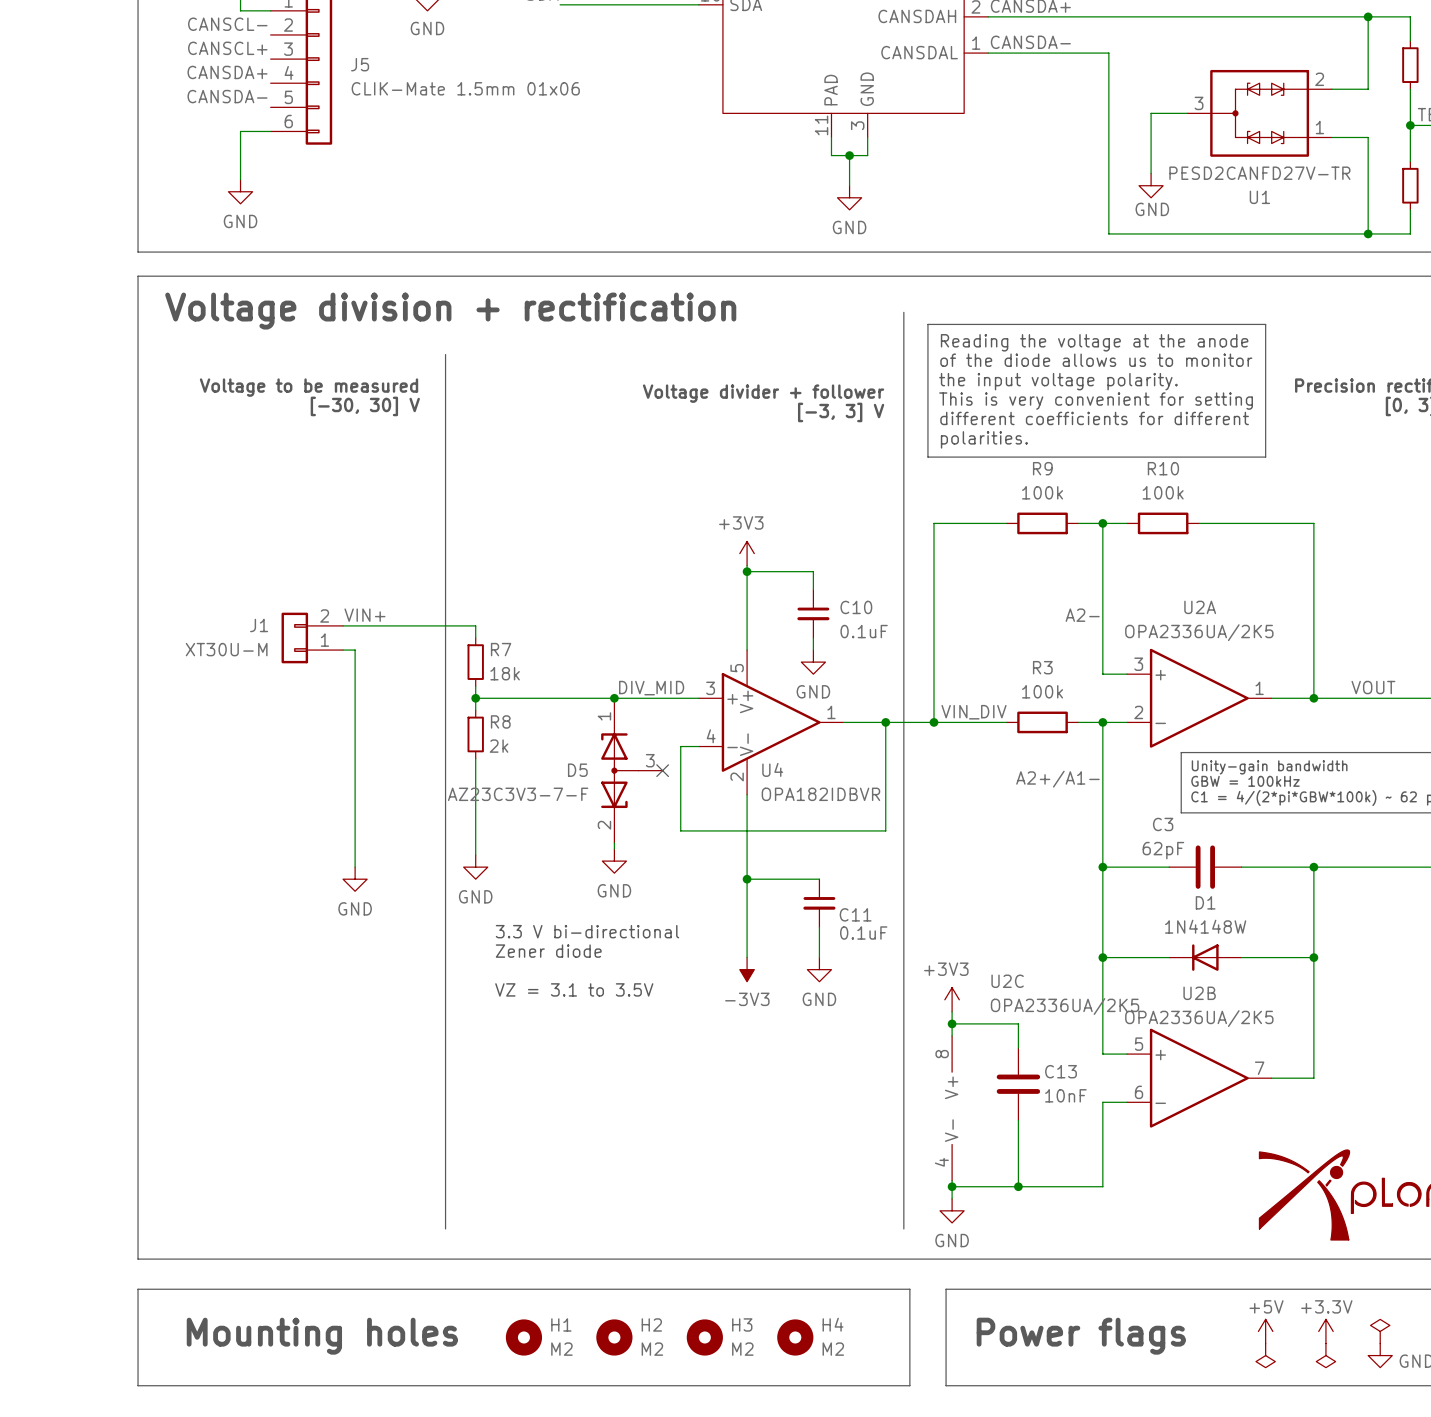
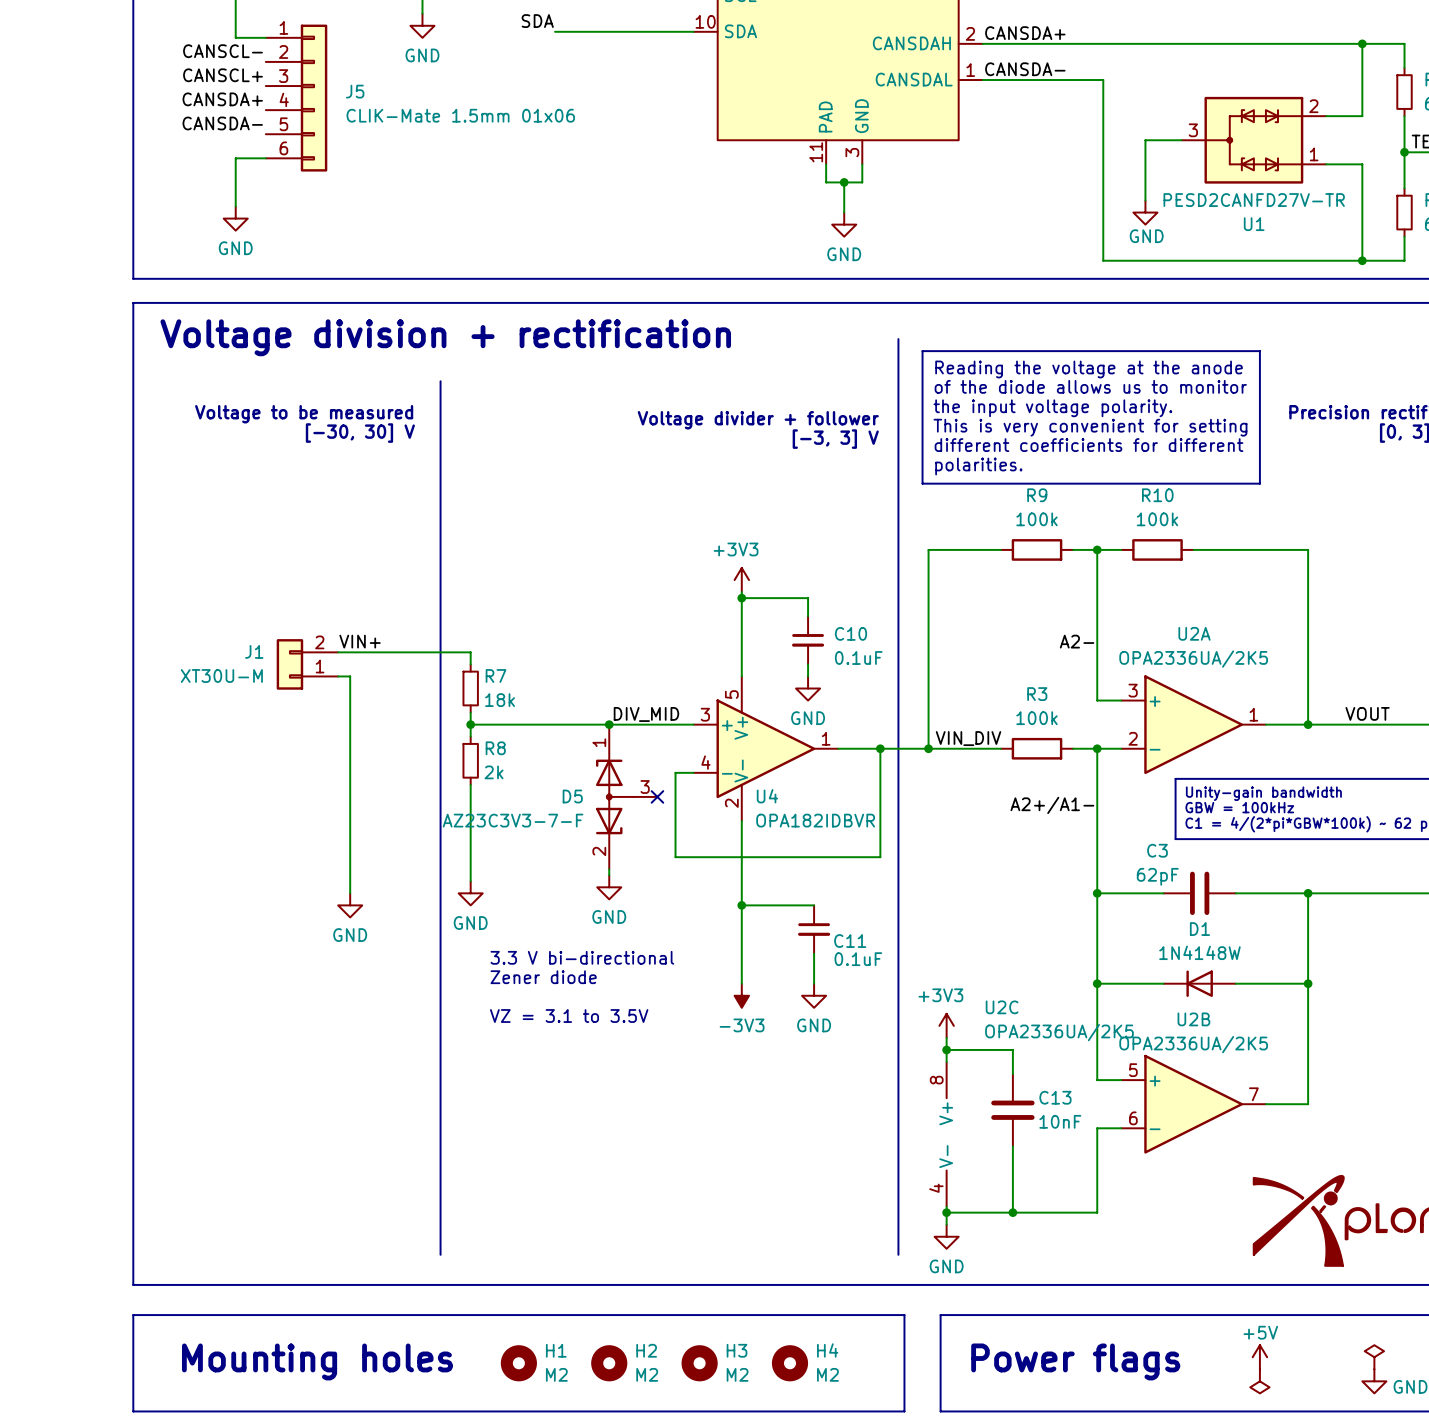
power symbol: +3.3V (1325, 1331) -> none
power symbol: (1325, 1355) -> none

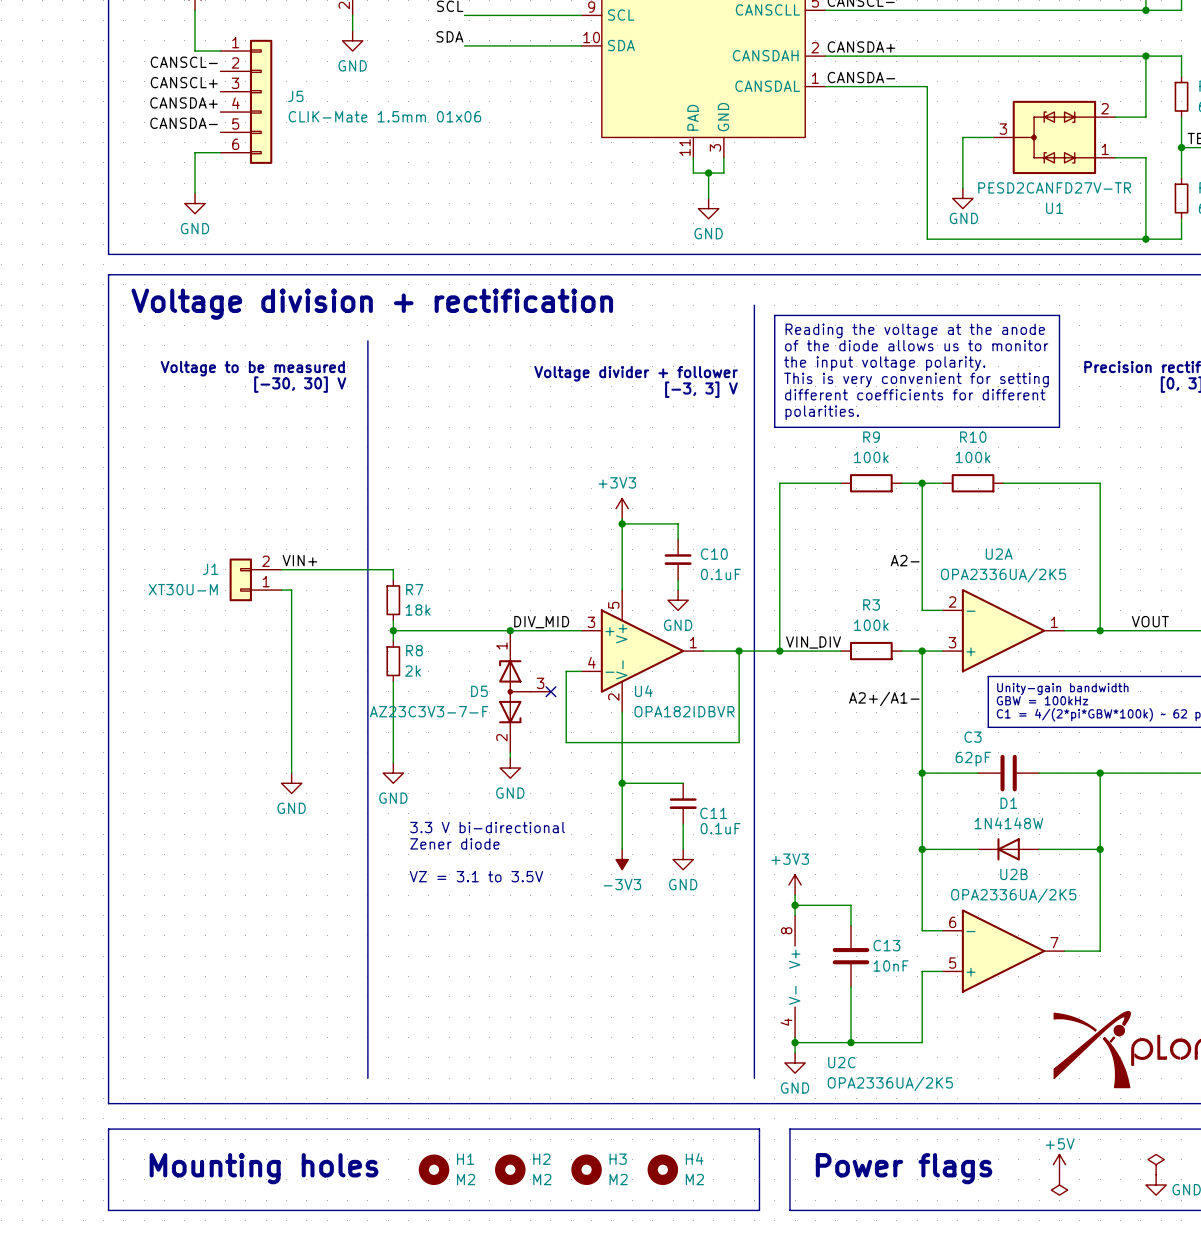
U2A flip: as is (1193, 724) -> up-down (1003, 630)
U2C name position: U2C (1002, 1007) -> U2C (841, 1062)
U2C value position: OPA2336UA/2K5 (1059, 1032) -> OPA2336UA/2K5 (890, 1083)
U2B flip: as is (1193, 1104) -> up-down (1003, 951)

